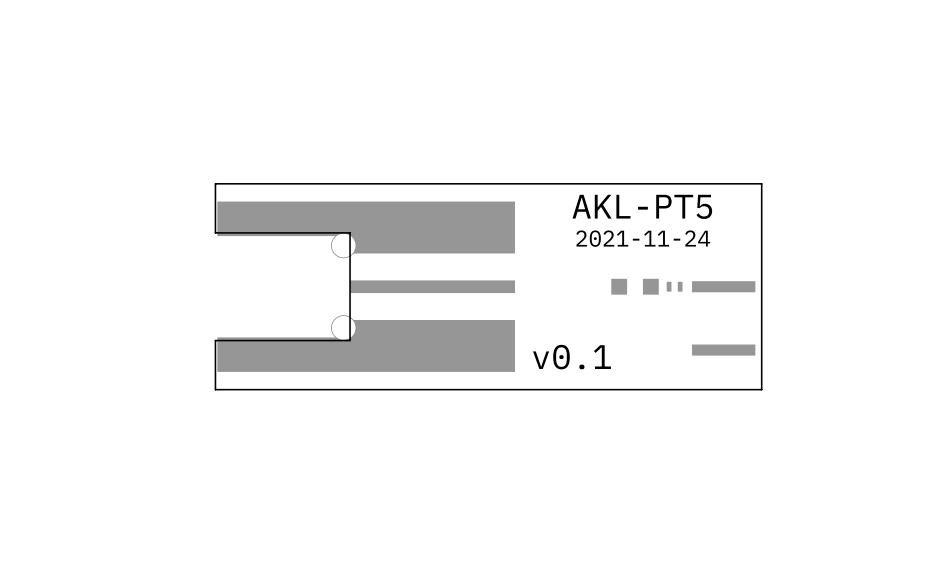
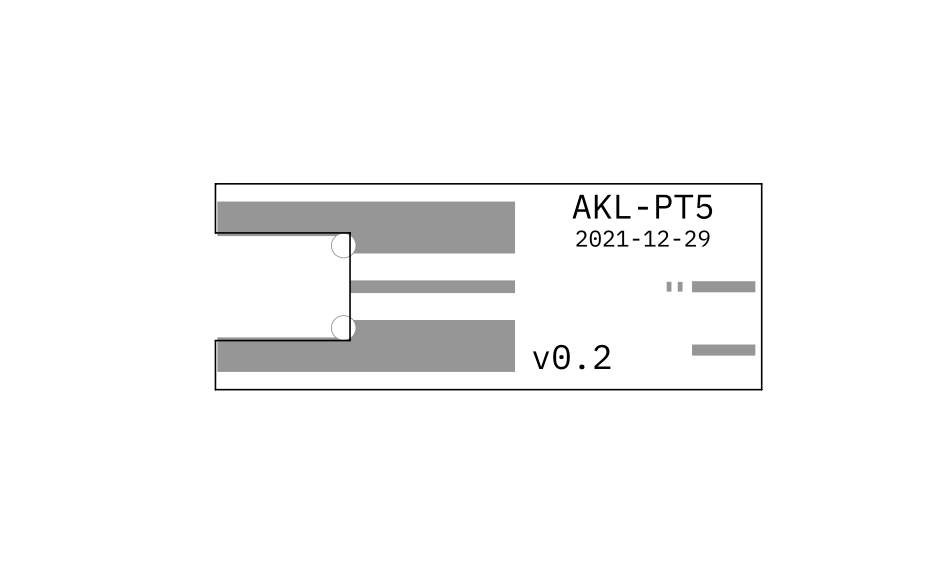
text: 2021-11-24 (643, 238) -> 2021-12-29 (642, 238)
part: (635, 286) -> none
text: v0.1 (571, 357) -> v0.2 (571, 357)

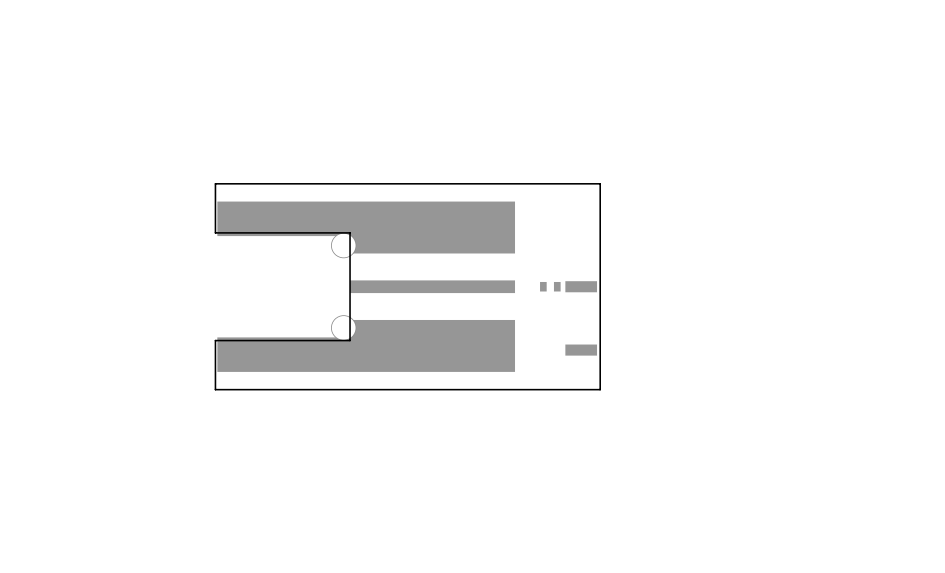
board edge: (600, 183) (761, 183) (761, 389) (600, 389) -> (600, 183) (600, 389)
text: AKL-PT5 (642, 206) -> none
text: 2021-12-29 (642, 238) -> none
part: none -> (550, 286)
part: none -> (581, 286)
part: (674, 286) -> none
part: (723, 286) -> none
part: none -> (581, 350)
part: (723, 350) -> none
text: v0.2 (571, 357) -> none

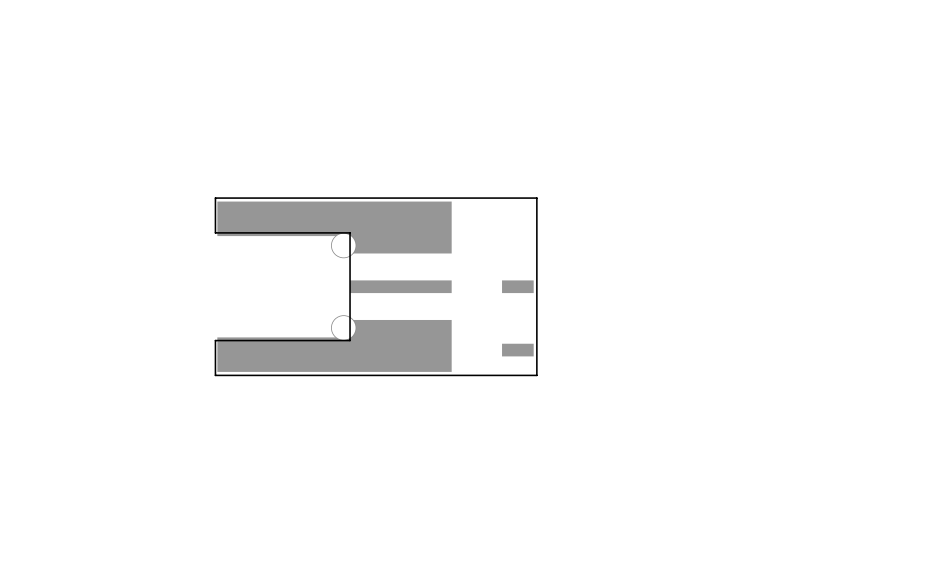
board edge: (215, 198) (215, 183) (600, 183) (600, 389) (215, 389) (215, 375) -> (215, 198) (536, 198) (536, 375) (215, 375)
part footprint: [217, 201, 516, 372] -> [217, 201, 452, 372]
part: none -> (517, 286)
part: (550, 286) -> none
part: (581, 286) -> none
part: none -> (517, 350)
part: (581, 350) -> none

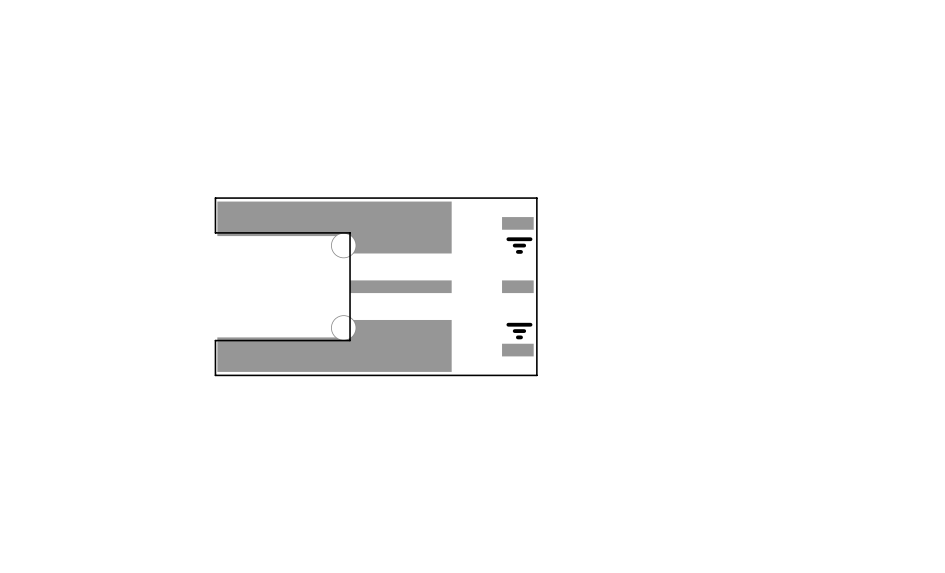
part: none -> (517, 223)
line: none -> (508, 239) (530, 239)
line: none -> (514, 245) (524, 245)
line: none -> (517, 251) (521, 251)
line: none -> (508, 324) (530, 324)
line: none -> (514, 331) (524, 331)
line: none -> (517, 337) (521, 337)

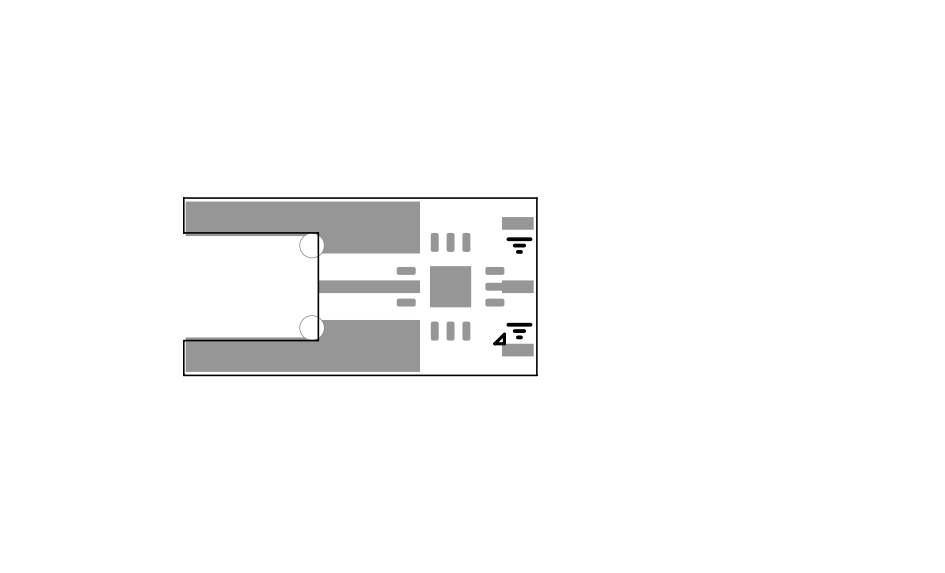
board edge: (215, 198) (215, 232) -> (215, 198) (183, 198) (183, 232) (215, 232)
board edge: (318, 232) (350, 232) (350, 340) (318, 340) -> (318, 232) (318, 340)
part position: (334, 286) -> (302, 286)
part: none -> (451, 289)
board edge: (215, 340) (215, 375) -> (215, 340) (183, 340) (183, 375) (215, 375)

